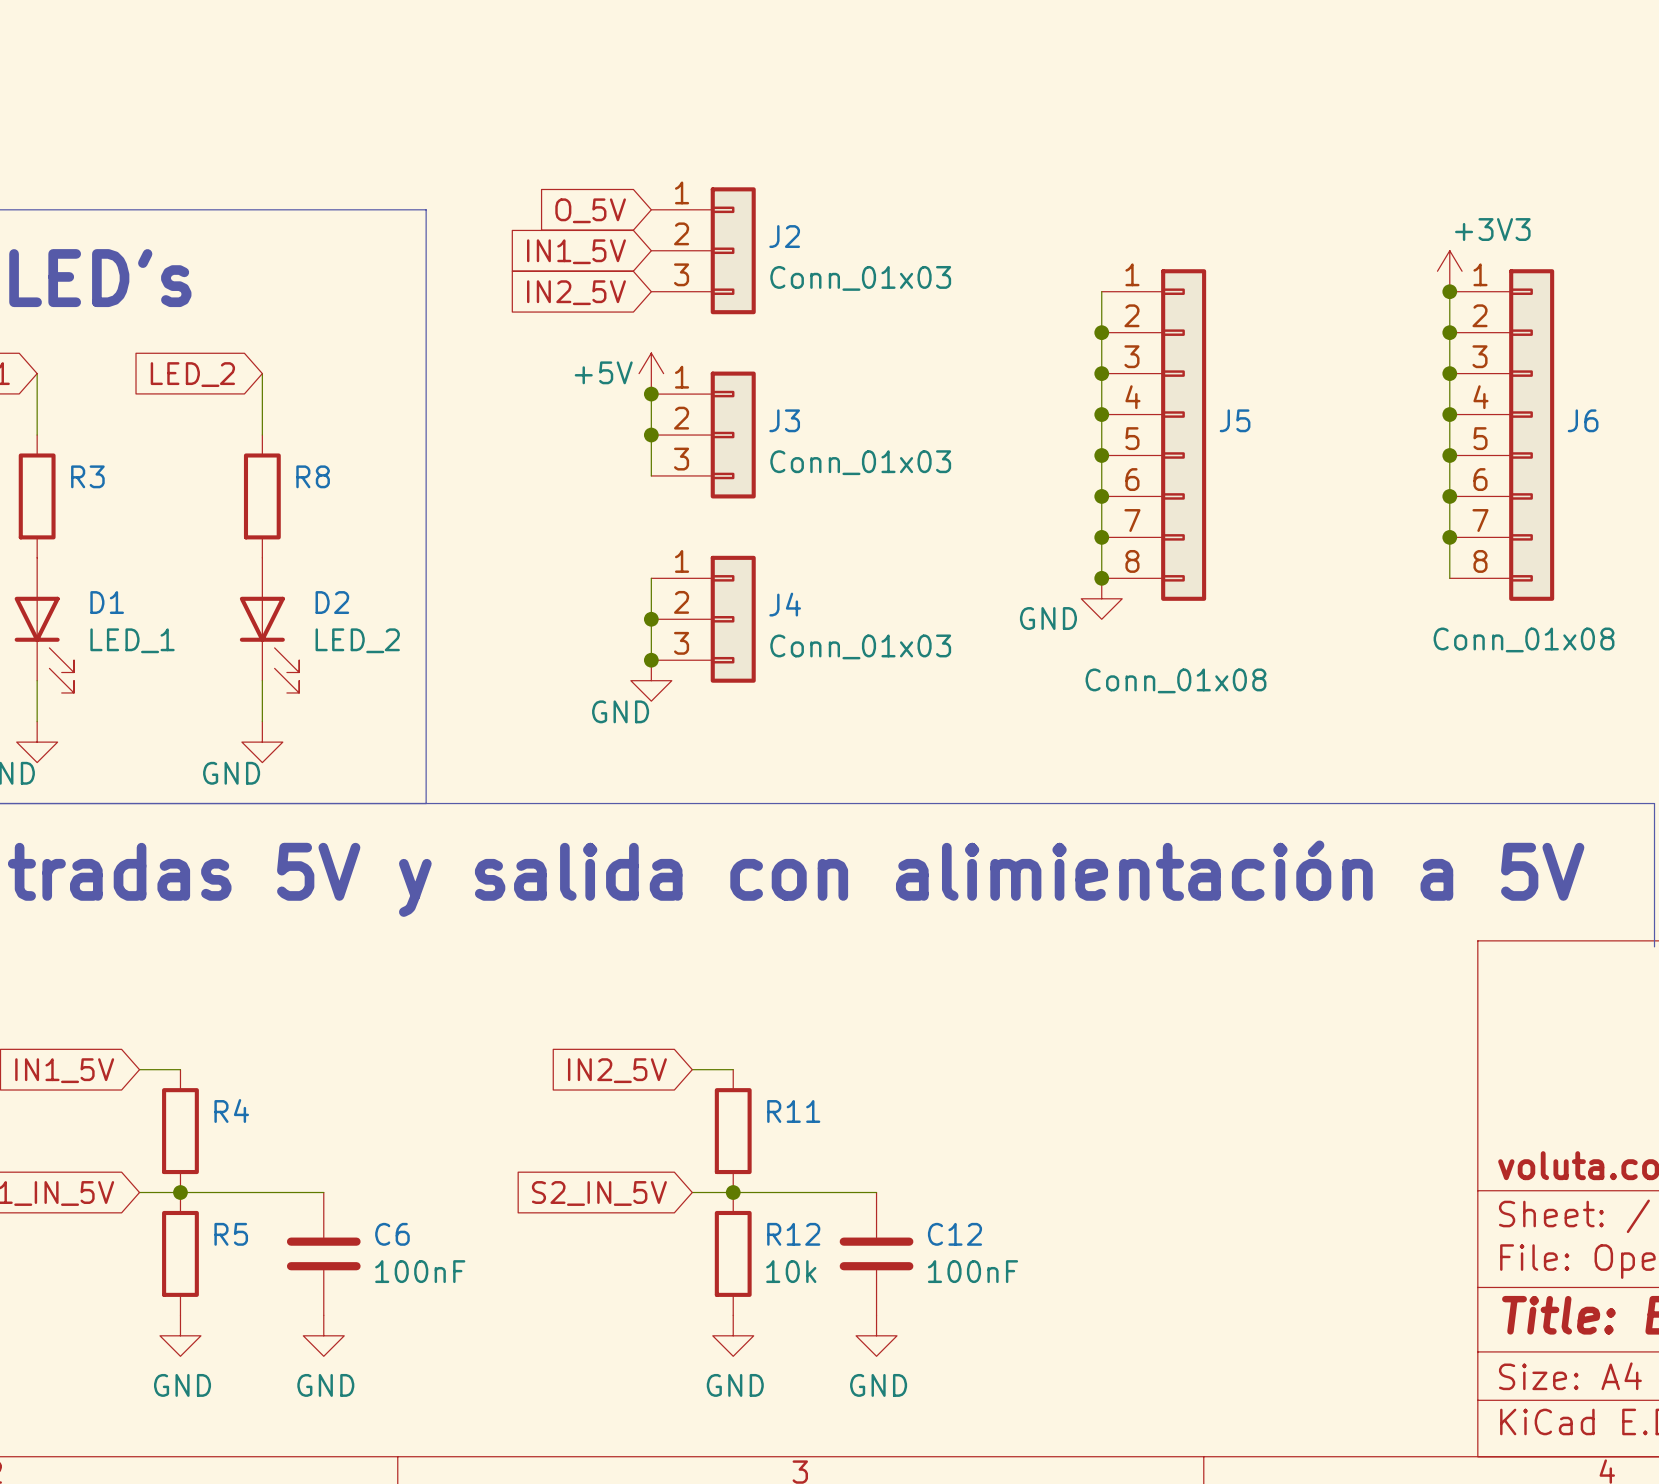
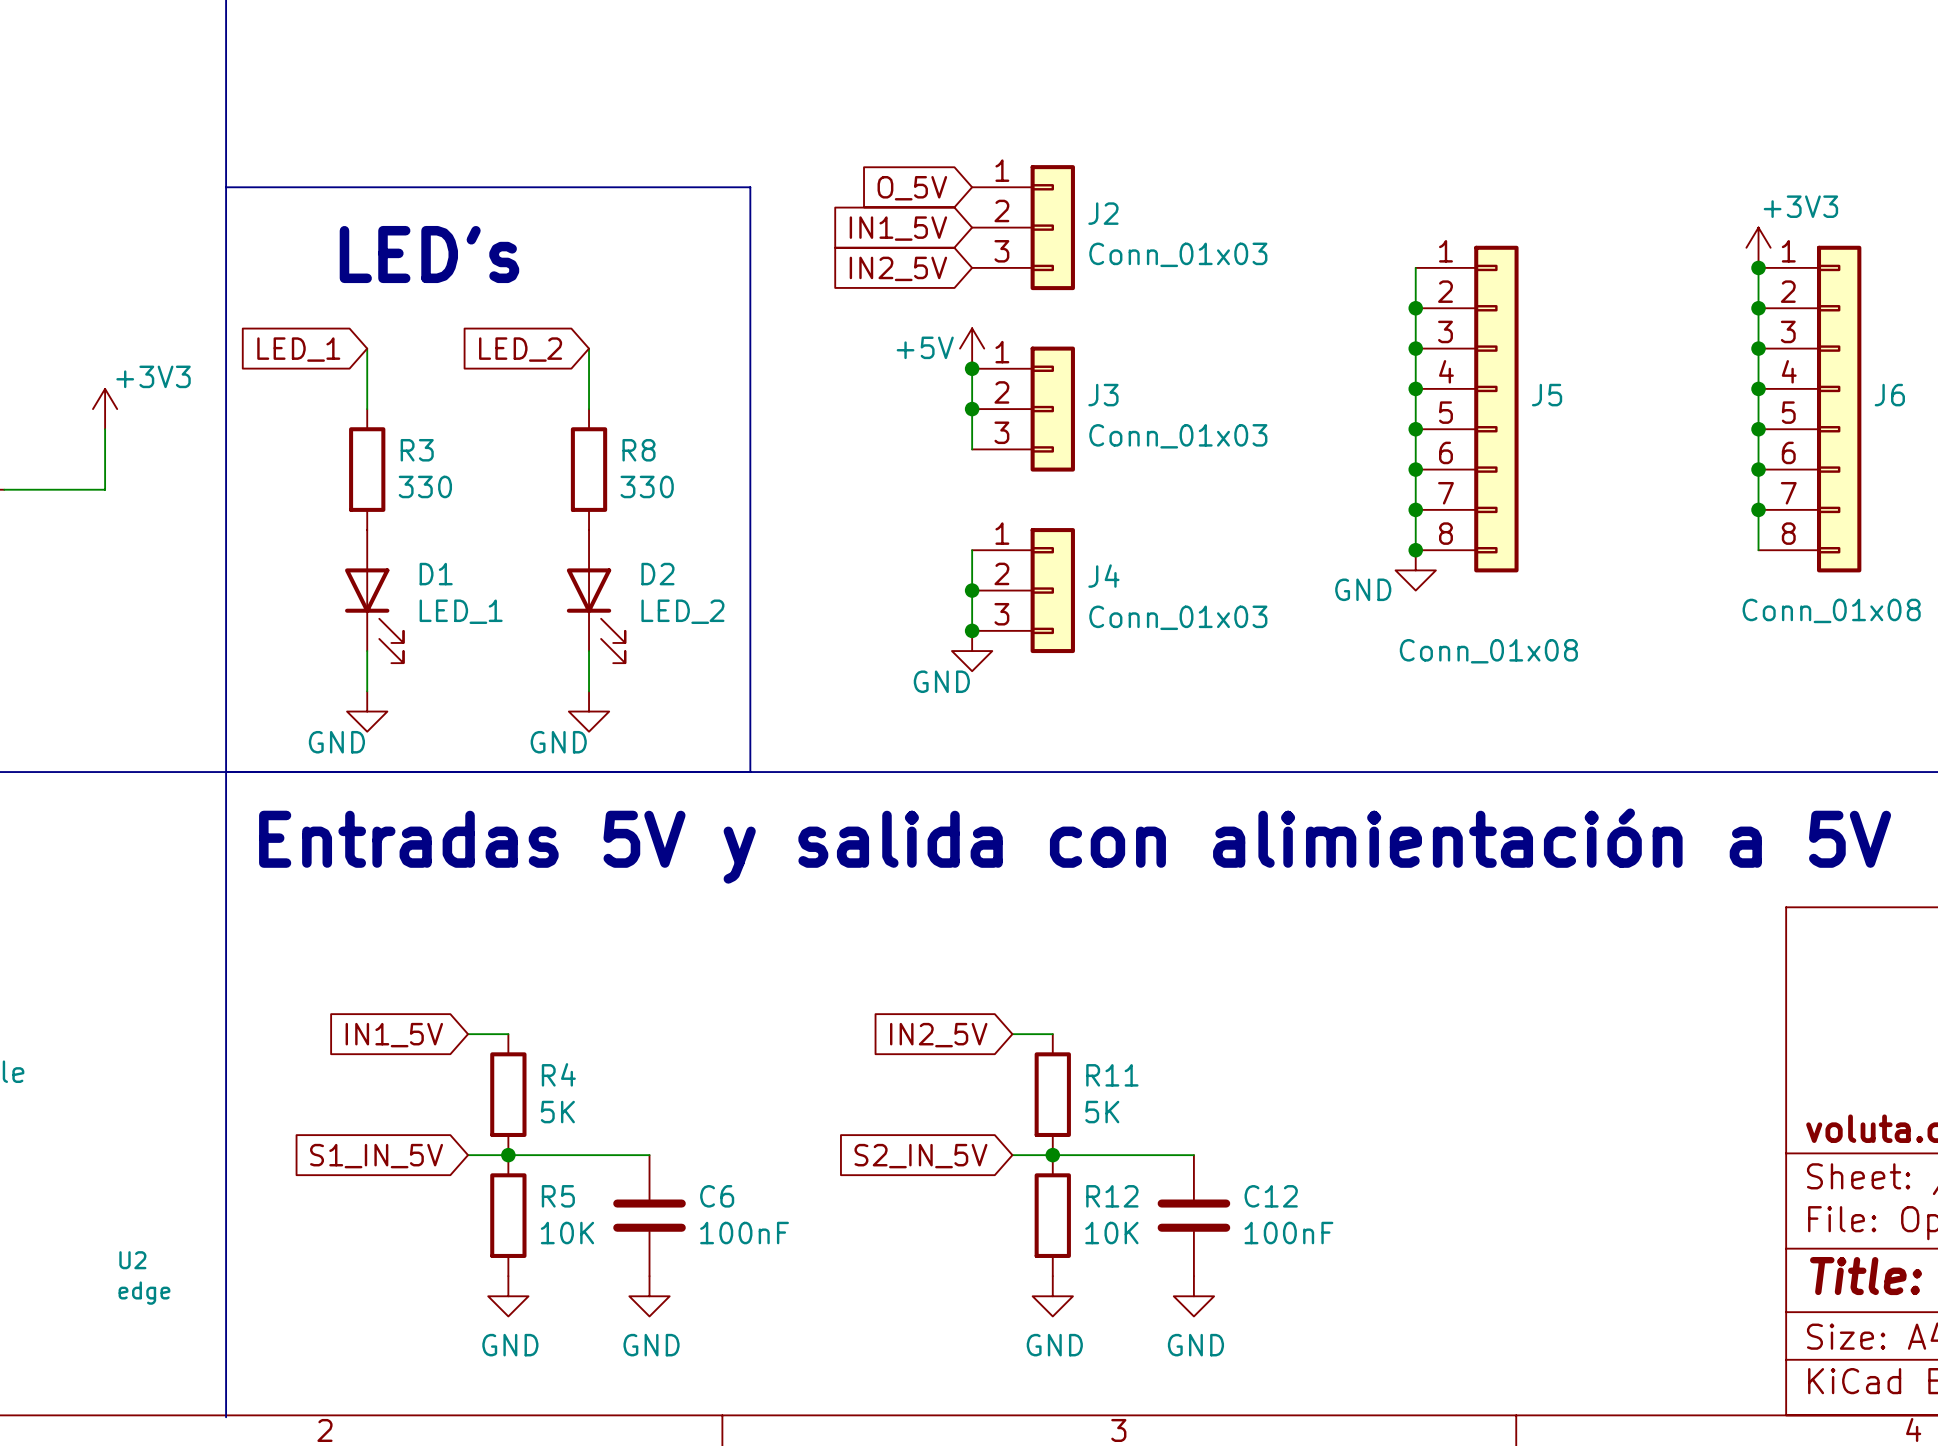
R3 value: none -> 330 (425, 486)
R8 value: none -> 330 (647, 486)
R4 value: none -> 5K (557, 1112)
R11 value: none -> 5K (1102, 1112)
R5 value: none -> 10K (567, 1233)
R12 value: 10k (791, 1271) -> 10K (1111, 1233)

